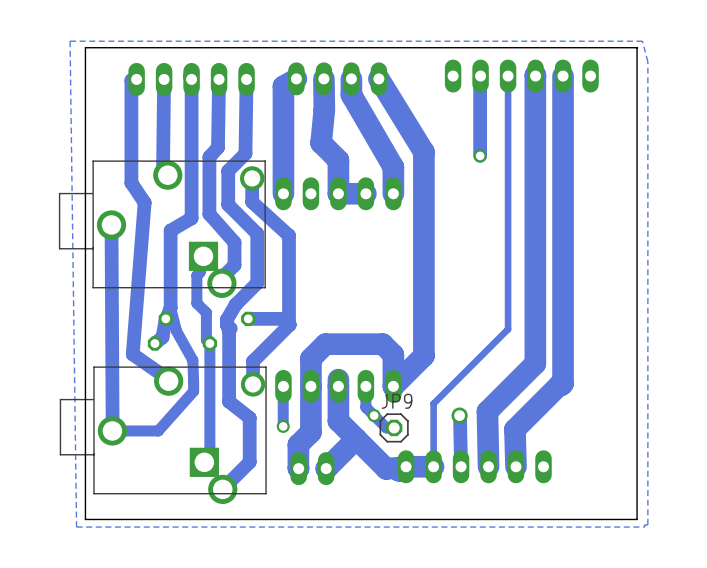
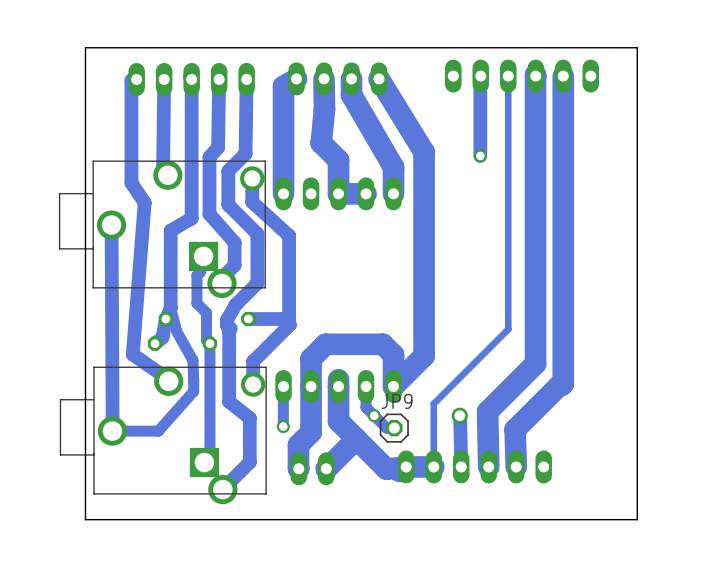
zone outline: (642, 41) (70, 41) (76, 527) (644, 527) (644, 524) (647, 524) (647, 61) (642, 41) -> none

